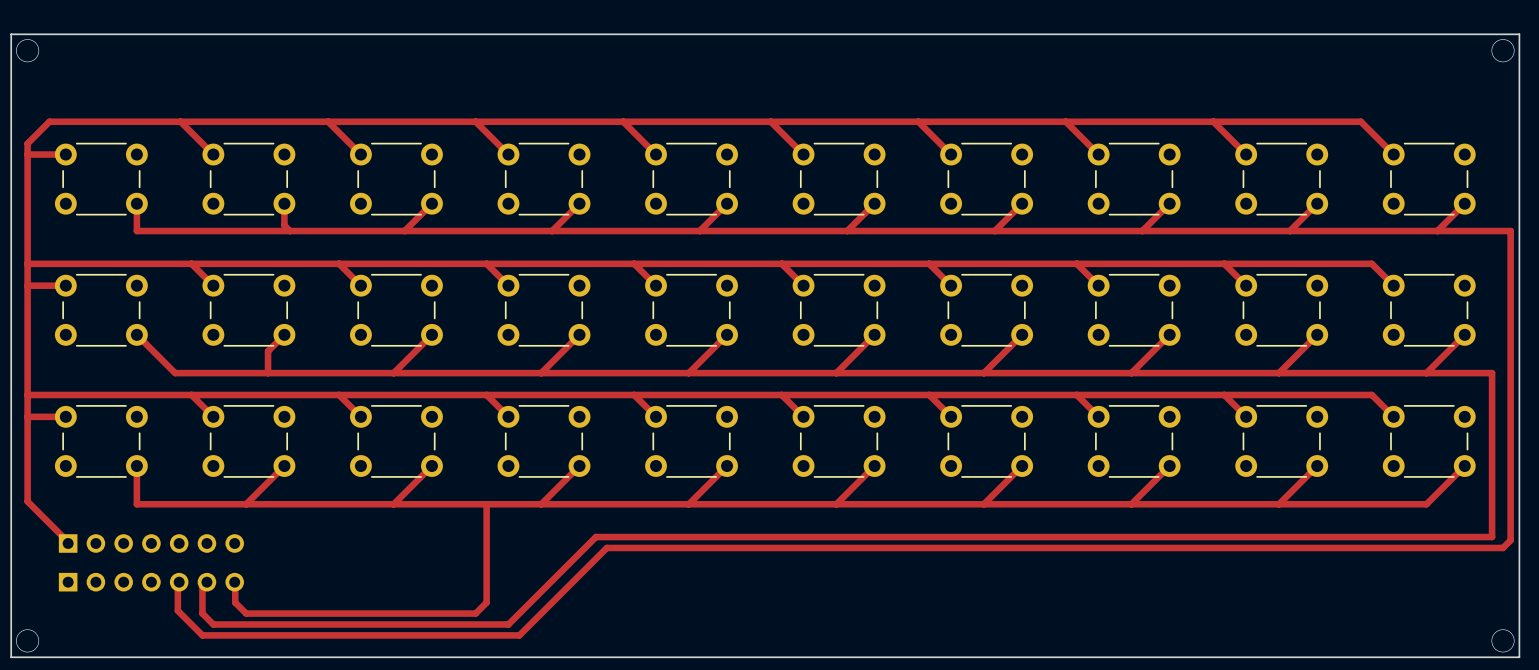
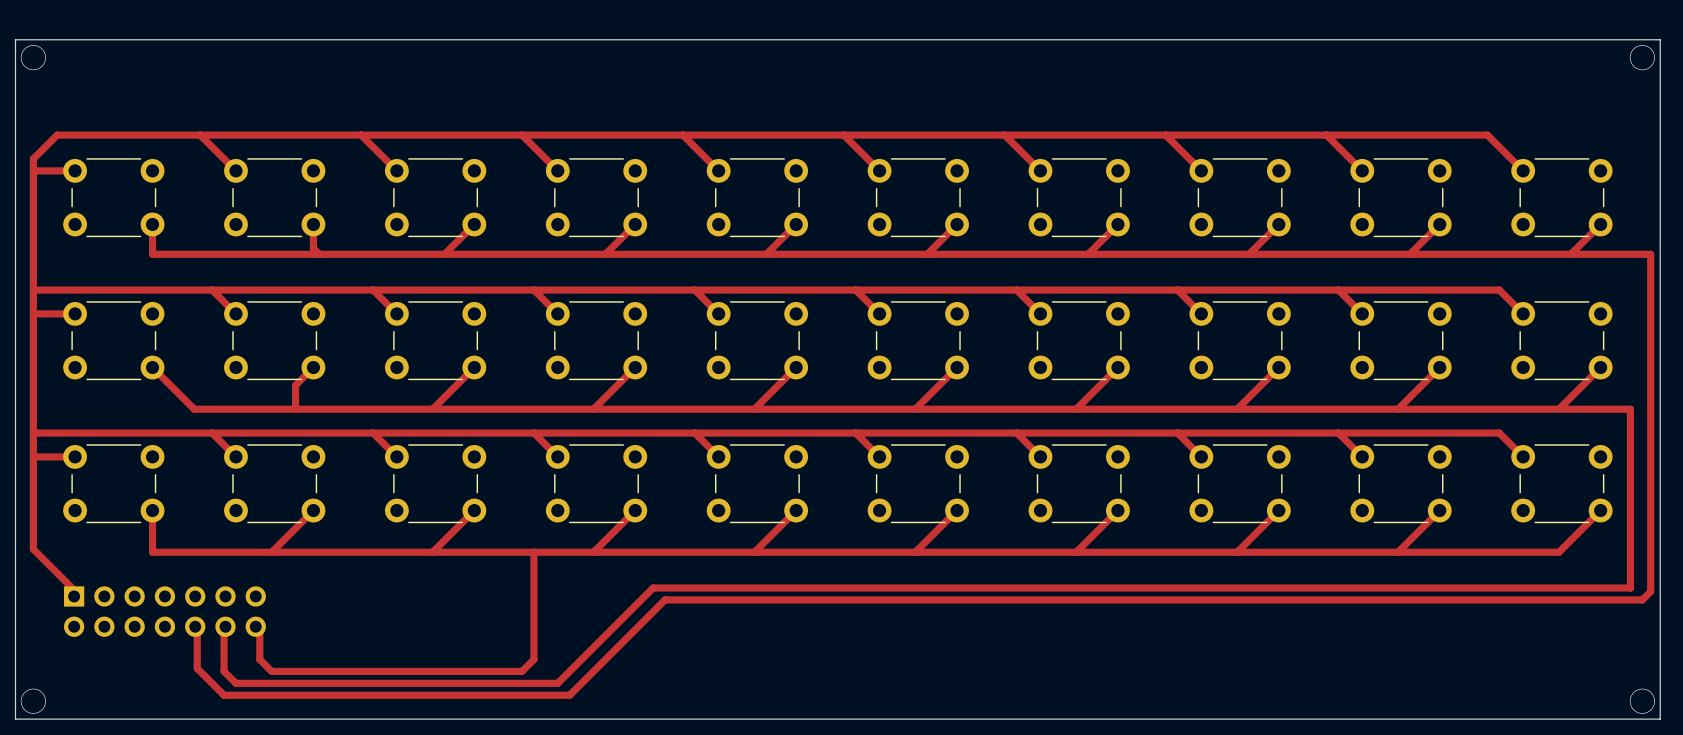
part: (151, 543) -> none
part: none -> (164, 611)
part: (151, 582) -> none

